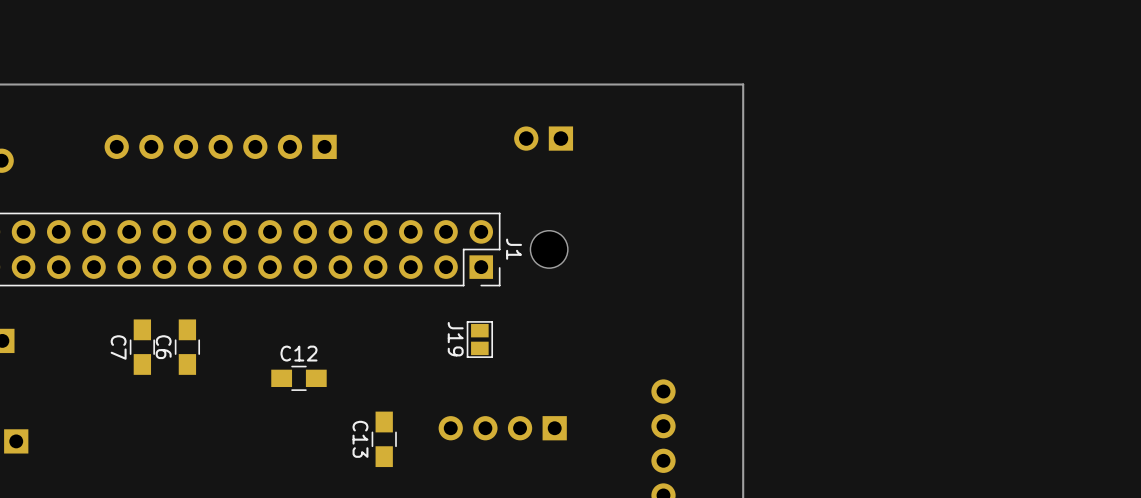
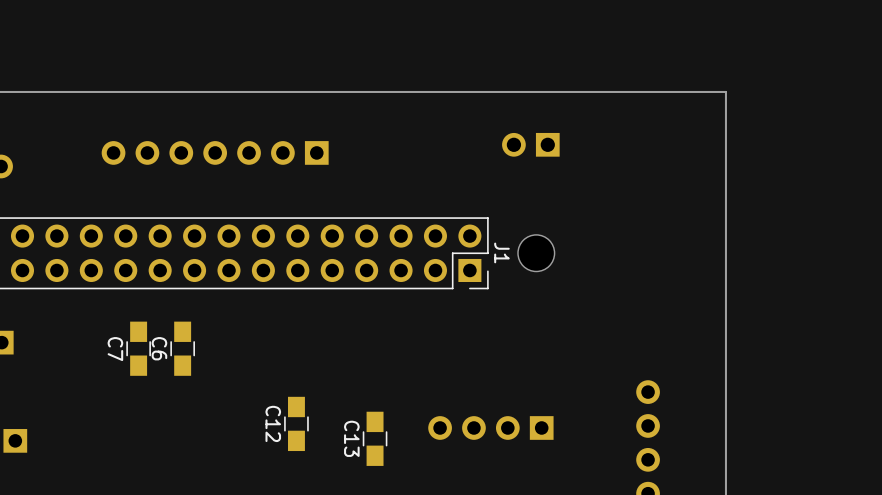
J19: (479, 339) -> none
C12 name position: C12 (298, 353) -> C12 (273, 423)
C12 rotation: 0° (298, 378) -> 90° clockwise (296, 423)
C12 position: (298, 378) -> (296, 423)

